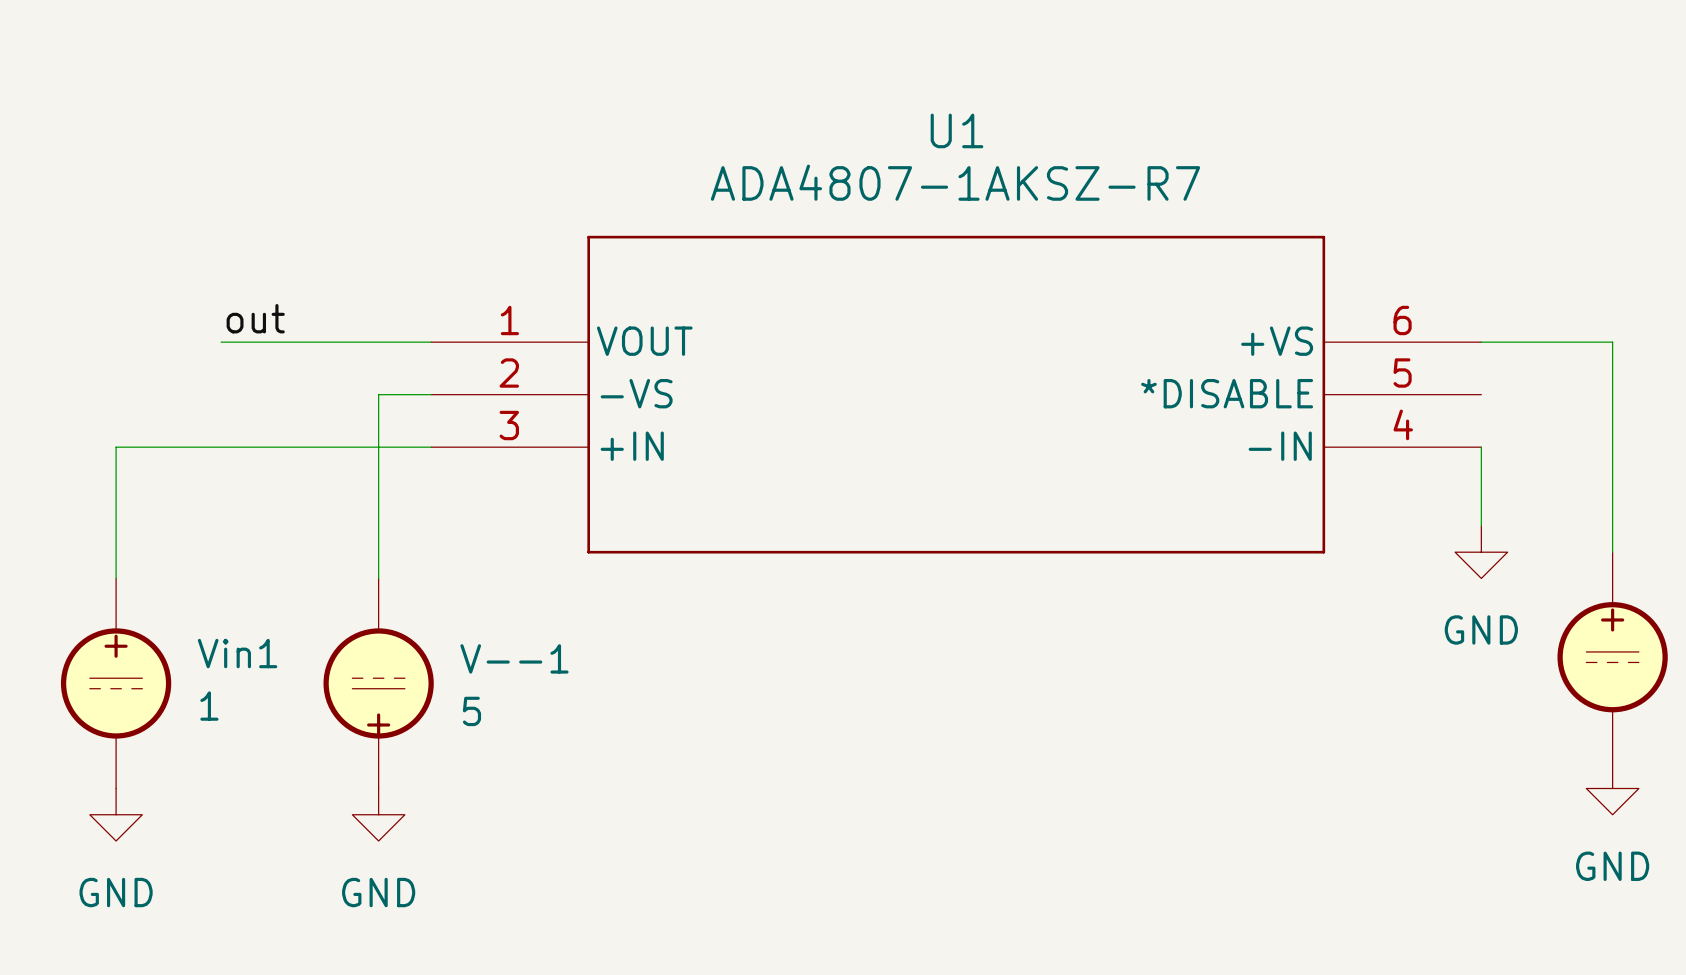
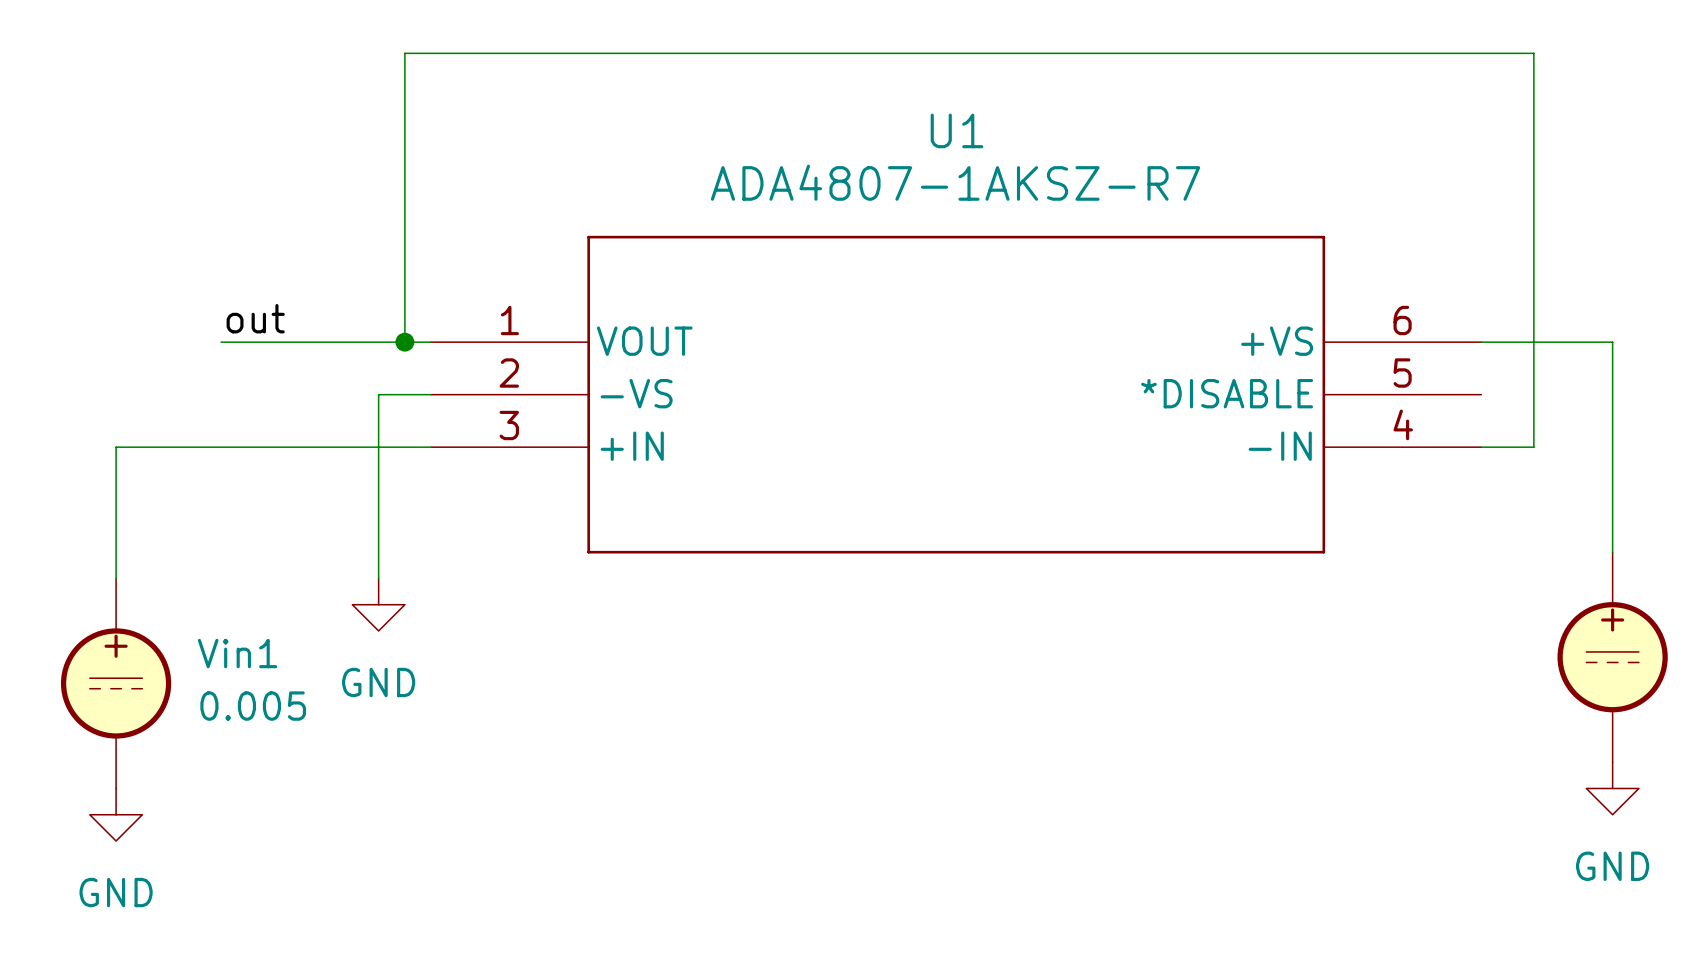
junction: none -> (404, 342)
wire: (1481, 447) (1481, 525) -> (1481, 447) (1533, 447) (1533, 53) (404, 53) (404, 342)
power symbol: GND (1481, 552) -> none
V--1: 5 (378, 683) -> none
Vin1 value: 1 (209, 706) -> 0.005 (253, 706)
power symbol position: GND (378, 814) -> GND (378, 604)

